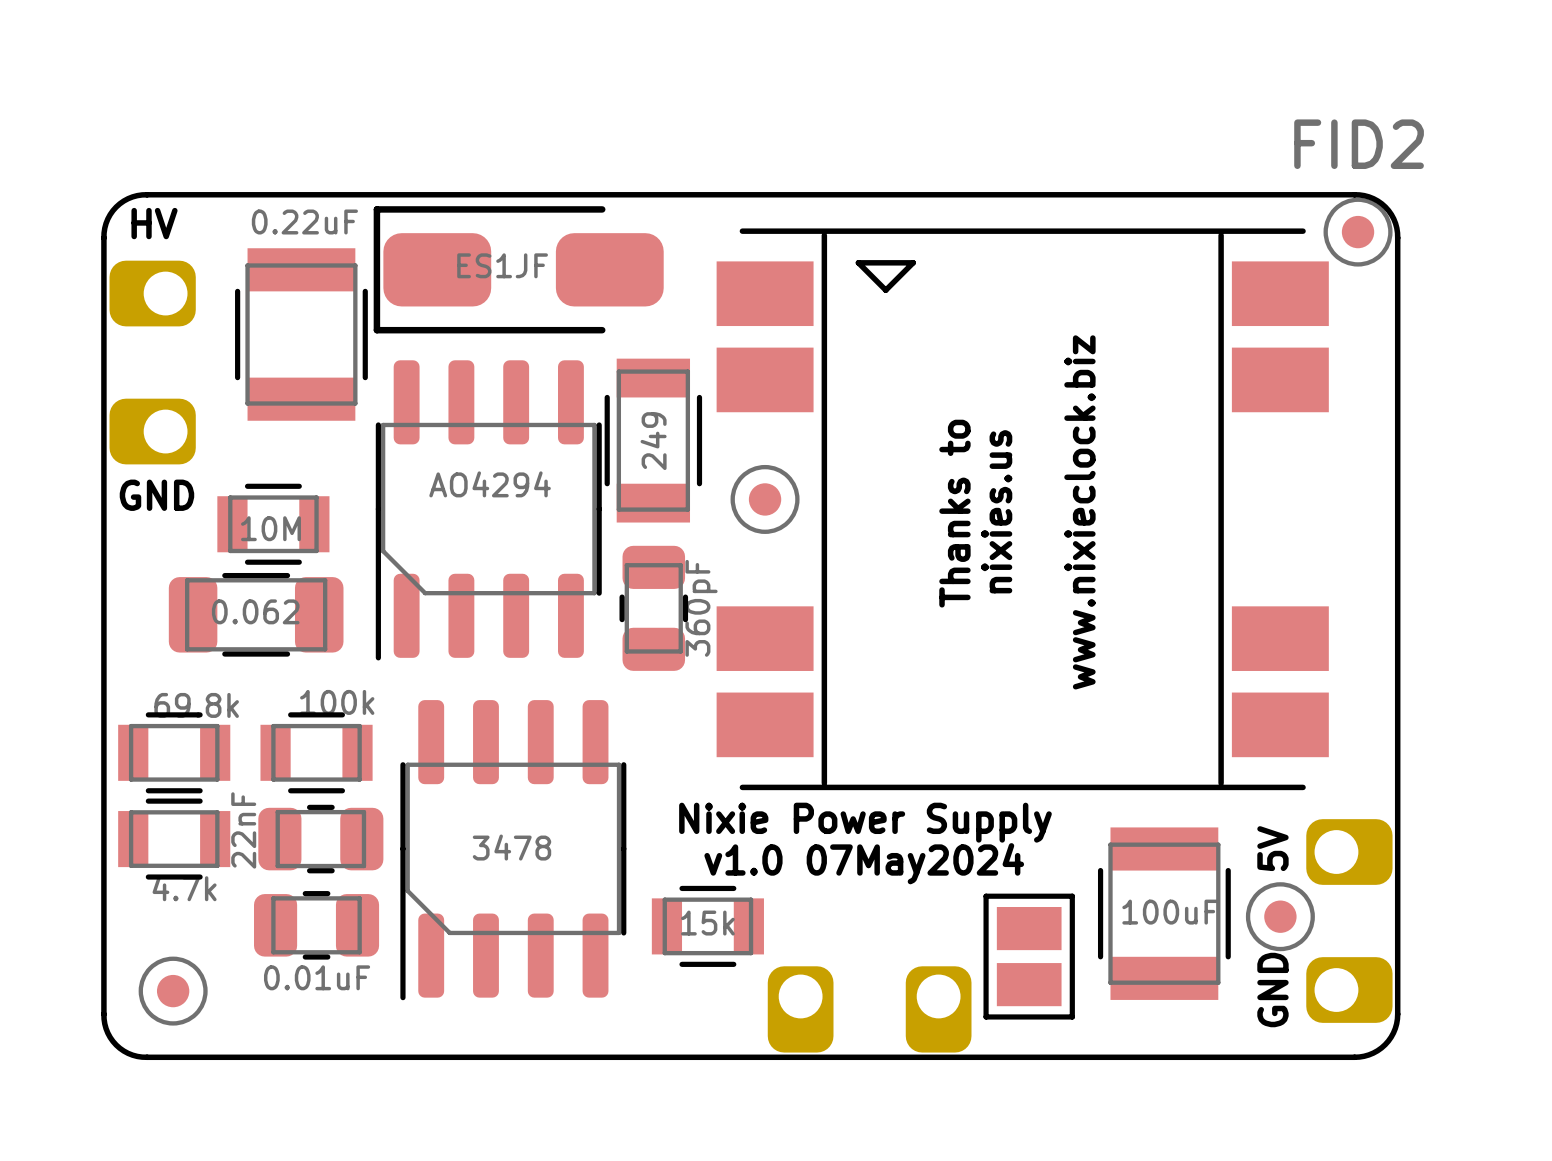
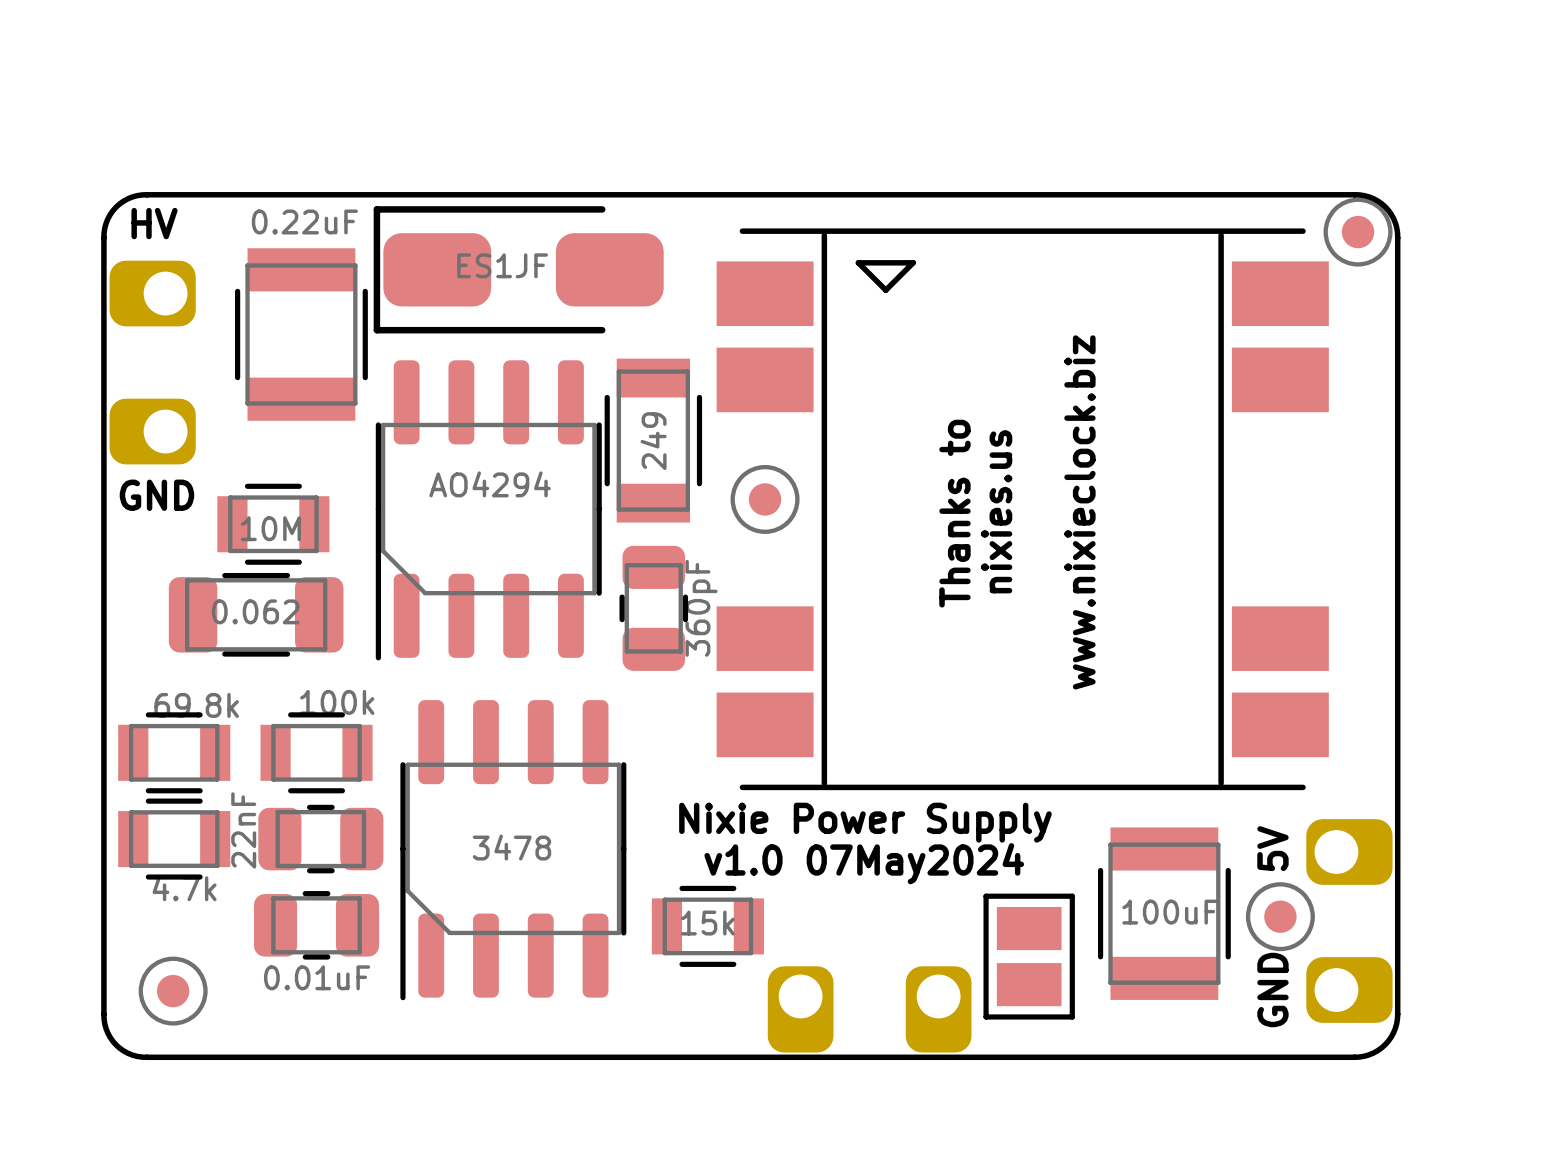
FID2 name: FID2 (1359, 144) -> none

